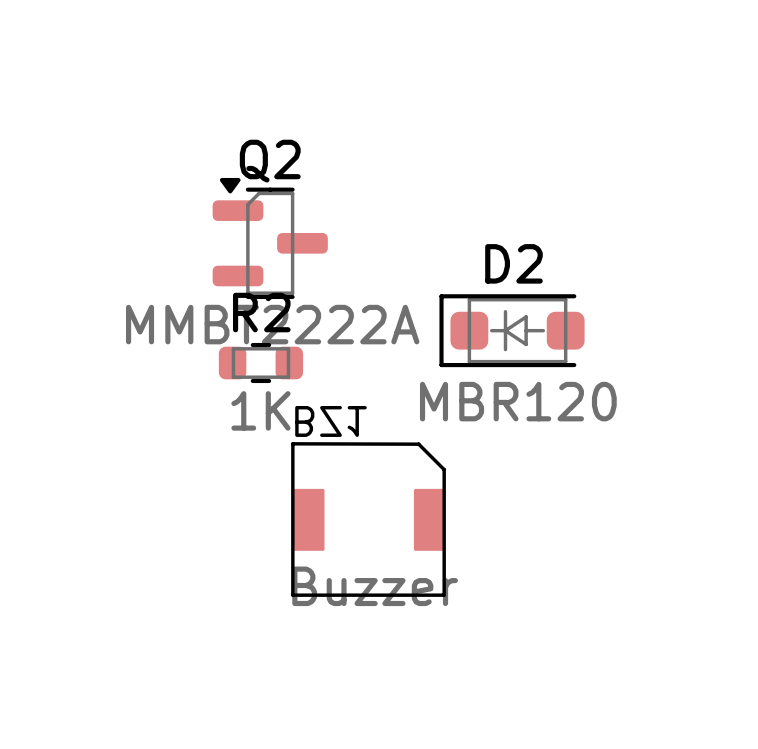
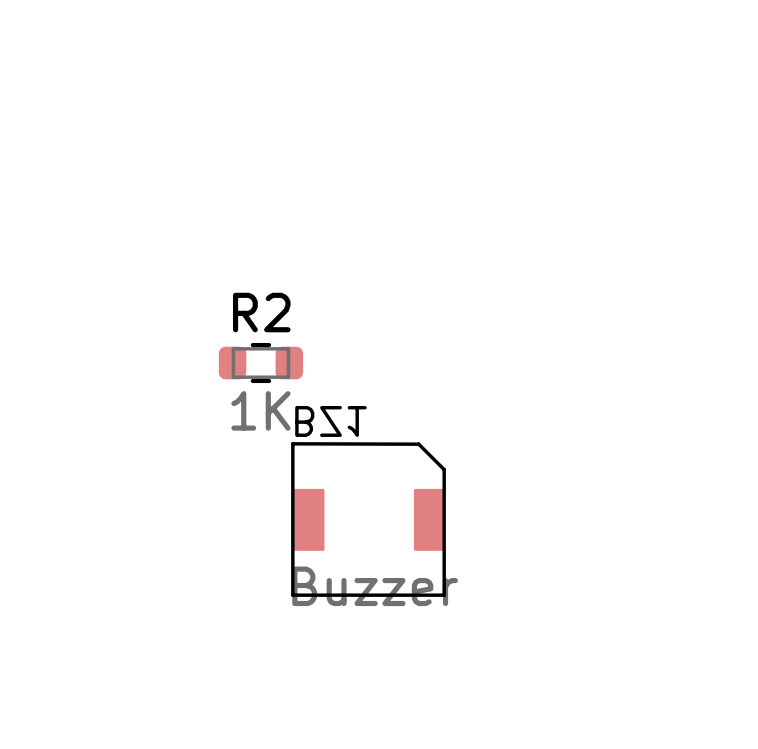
Q2: MMBT2222A (270, 238) -> none
D2: MBR120 (512, 330) -> none

